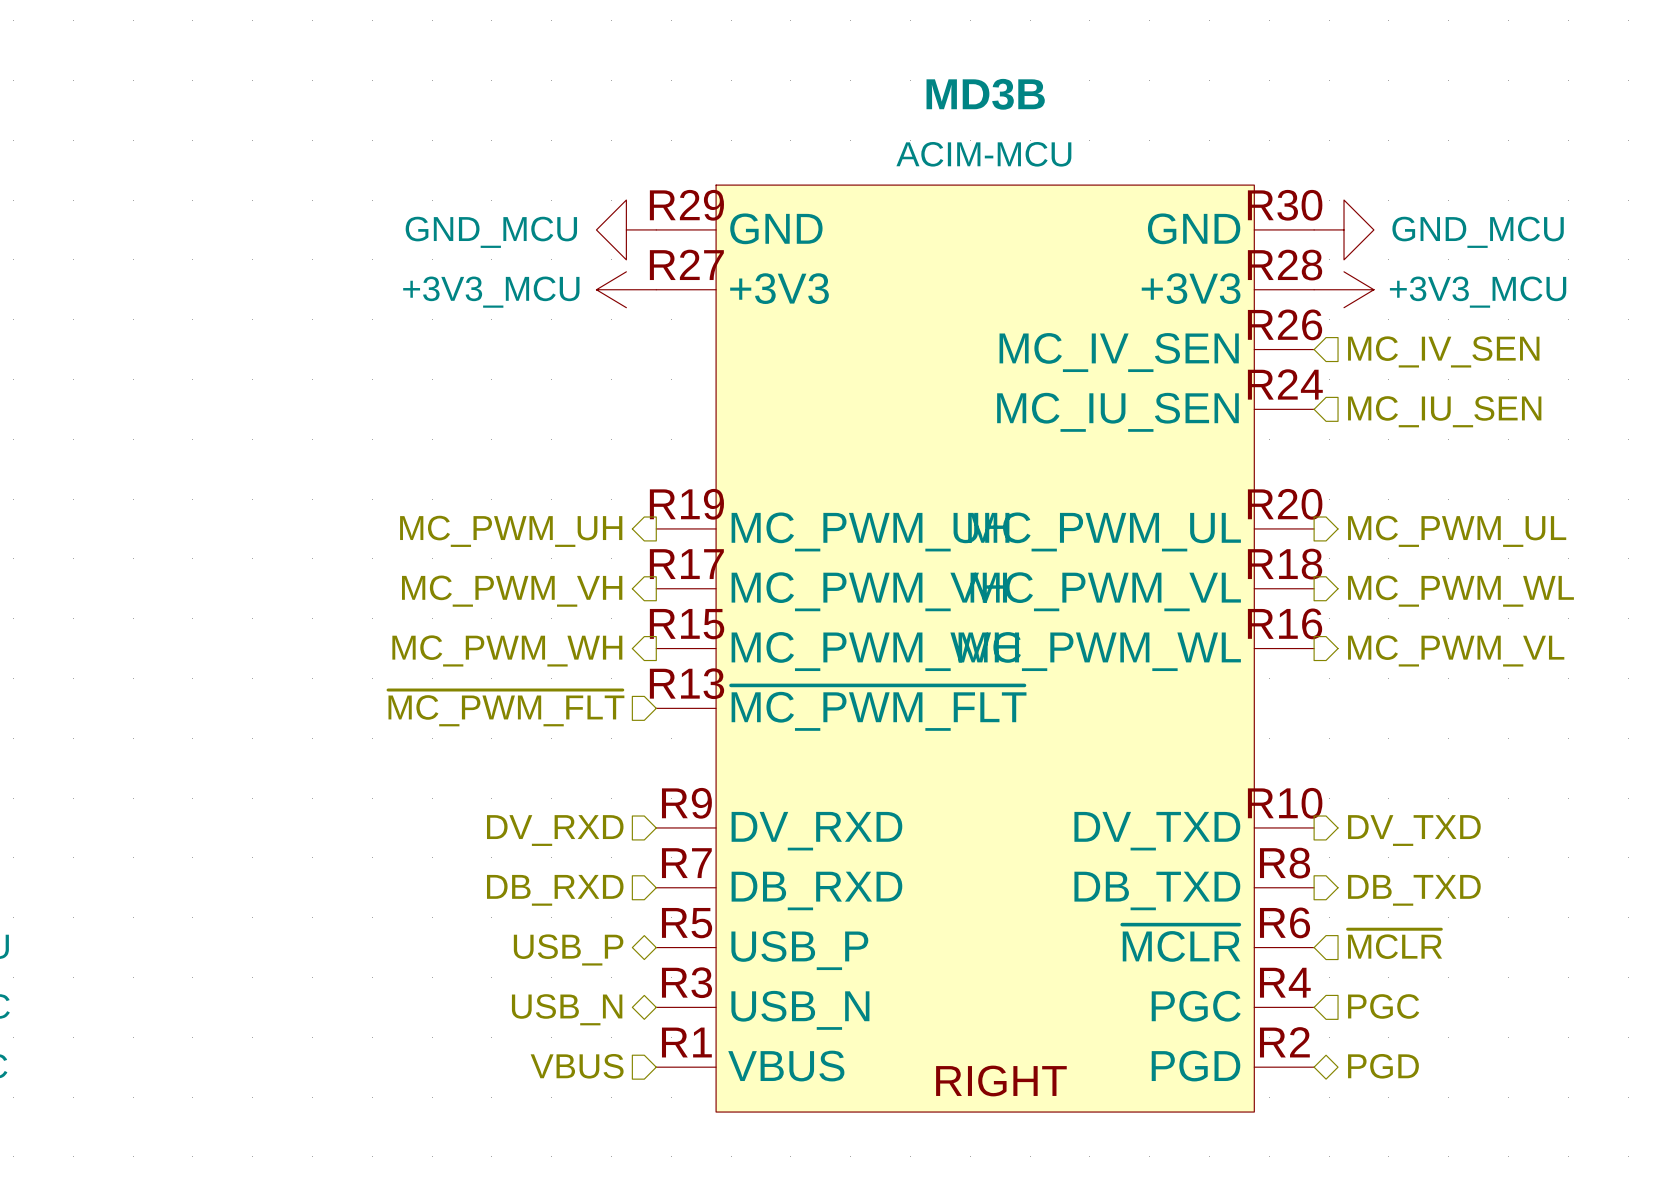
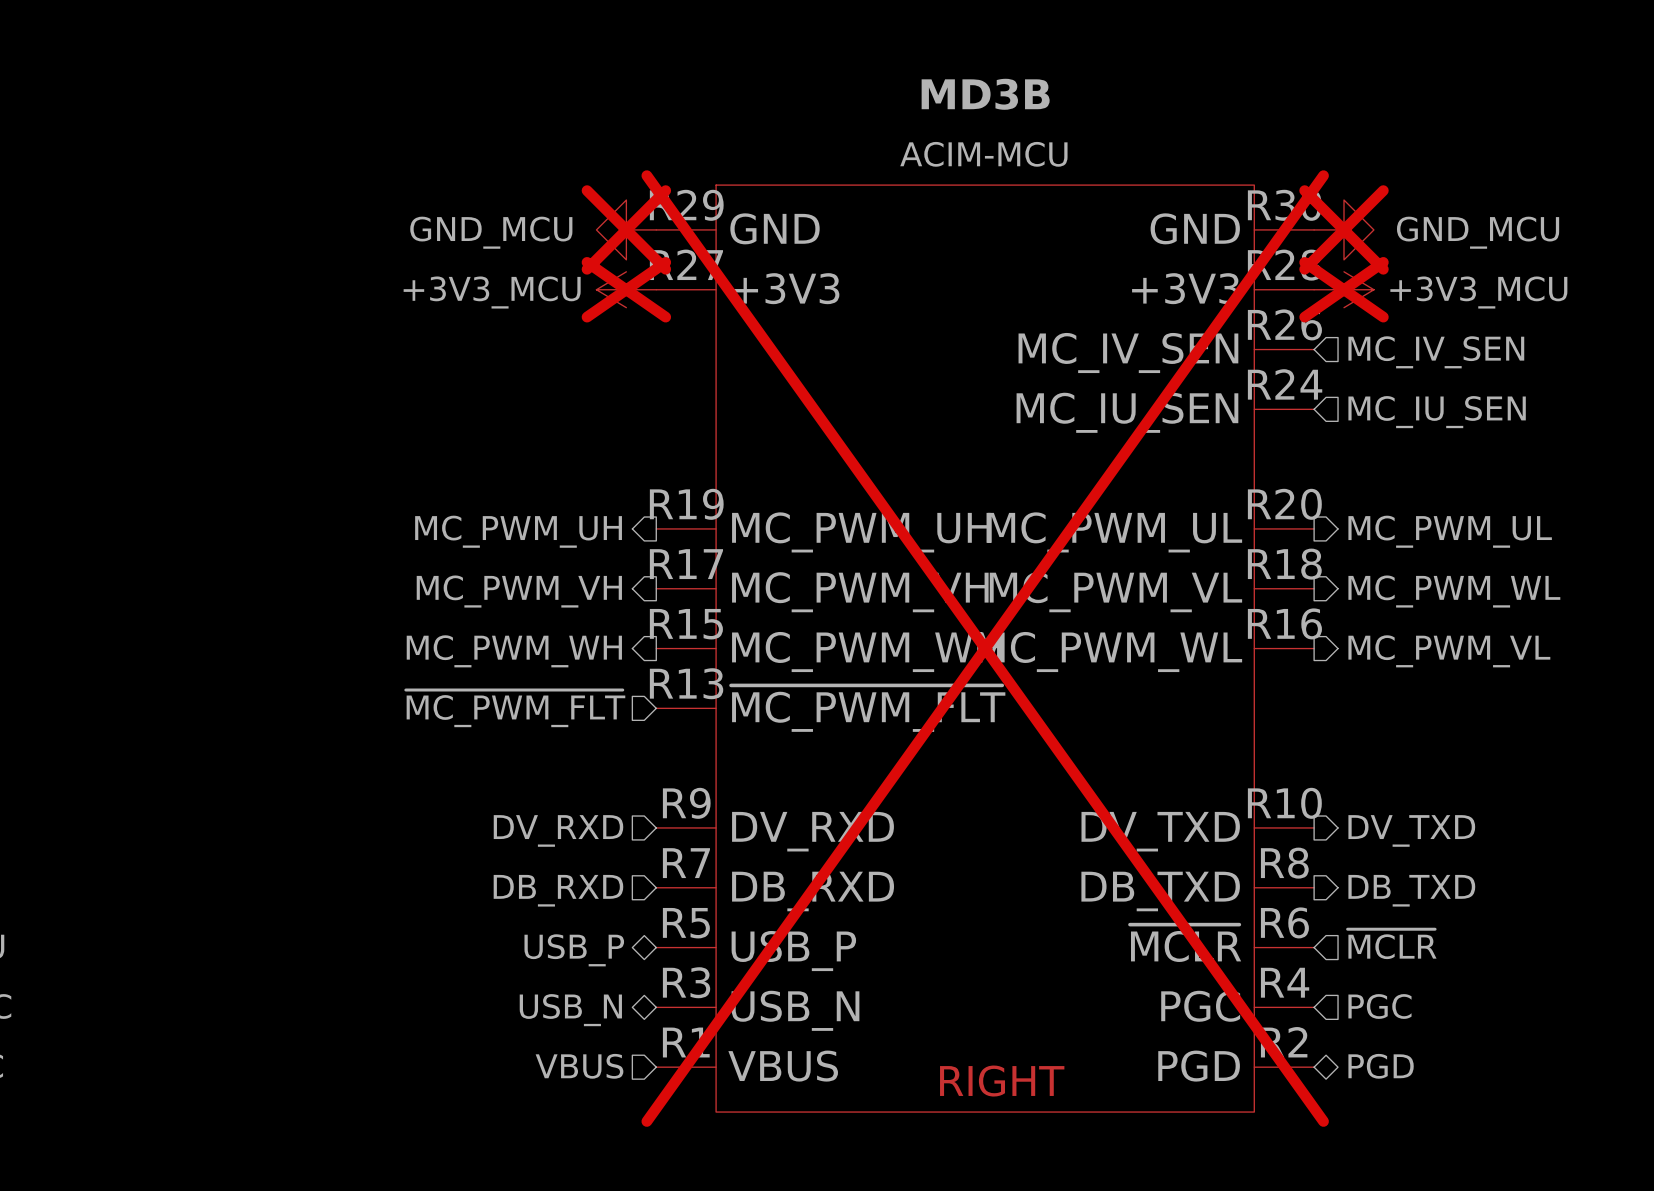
power symbol do-not-place cross: none -> (626, 229)
power symbol do-not-place cross: none -> (1344, 229)
power symbol do-not-place cross: none -> (626, 289)
power symbol do-not-place cross: none -> (1344, 289)
MD3B do-not-place cross: none -> (985, 648)

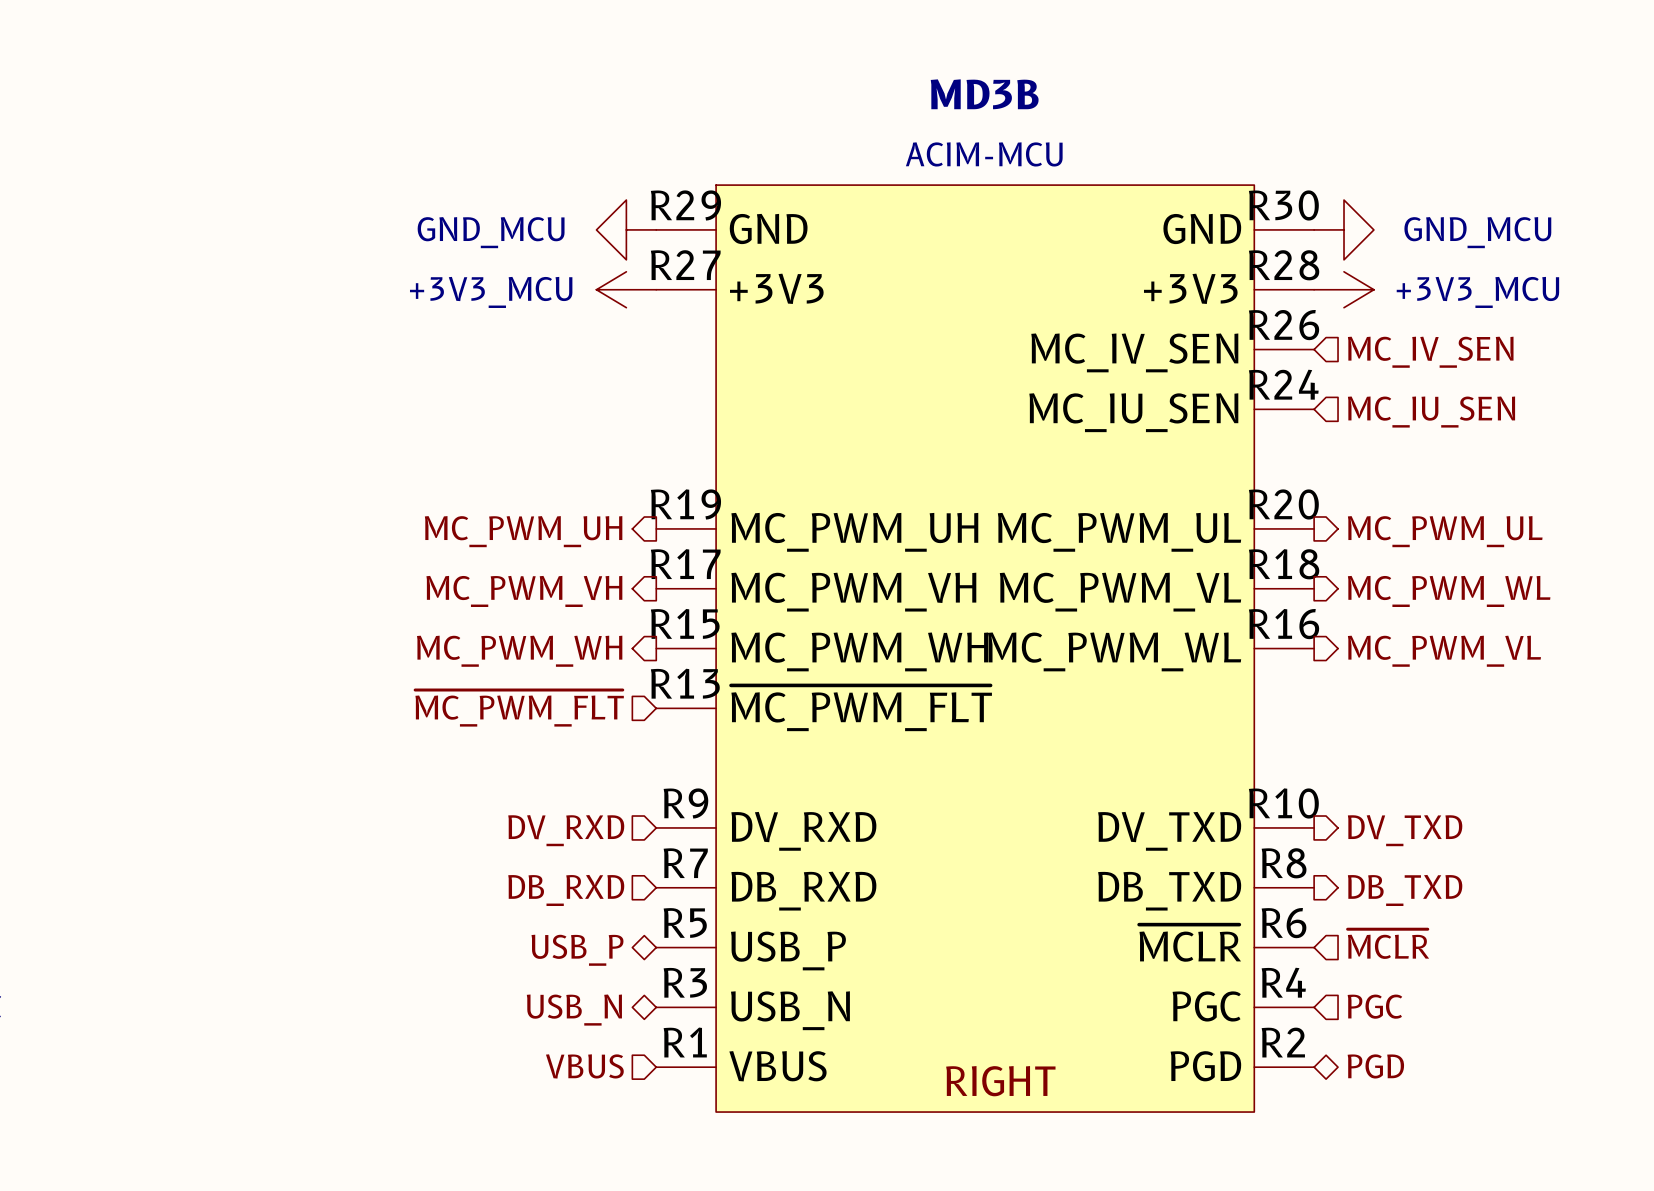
power symbol do-not-place cross: (626, 229) -> none
power symbol do-not-place cross: (1344, 229) -> none
power symbol do-not-place cross: (626, 289) -> none
power symbol do-not-place cross: (1344, 289) -> none
MD3B do-not-place cross: (985, 648) -> none

